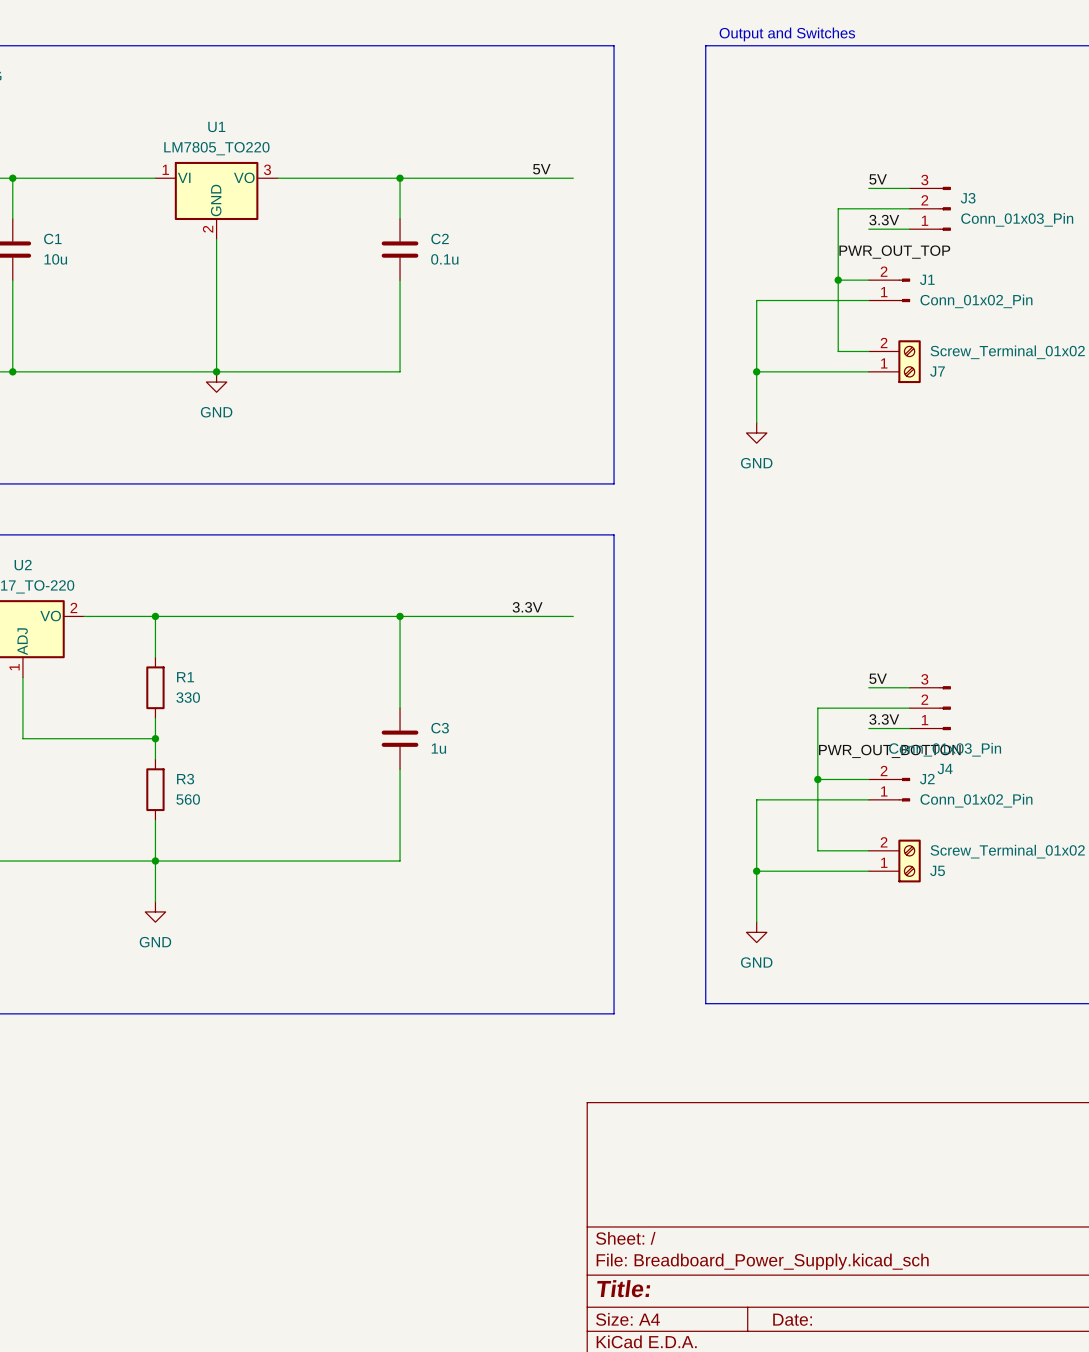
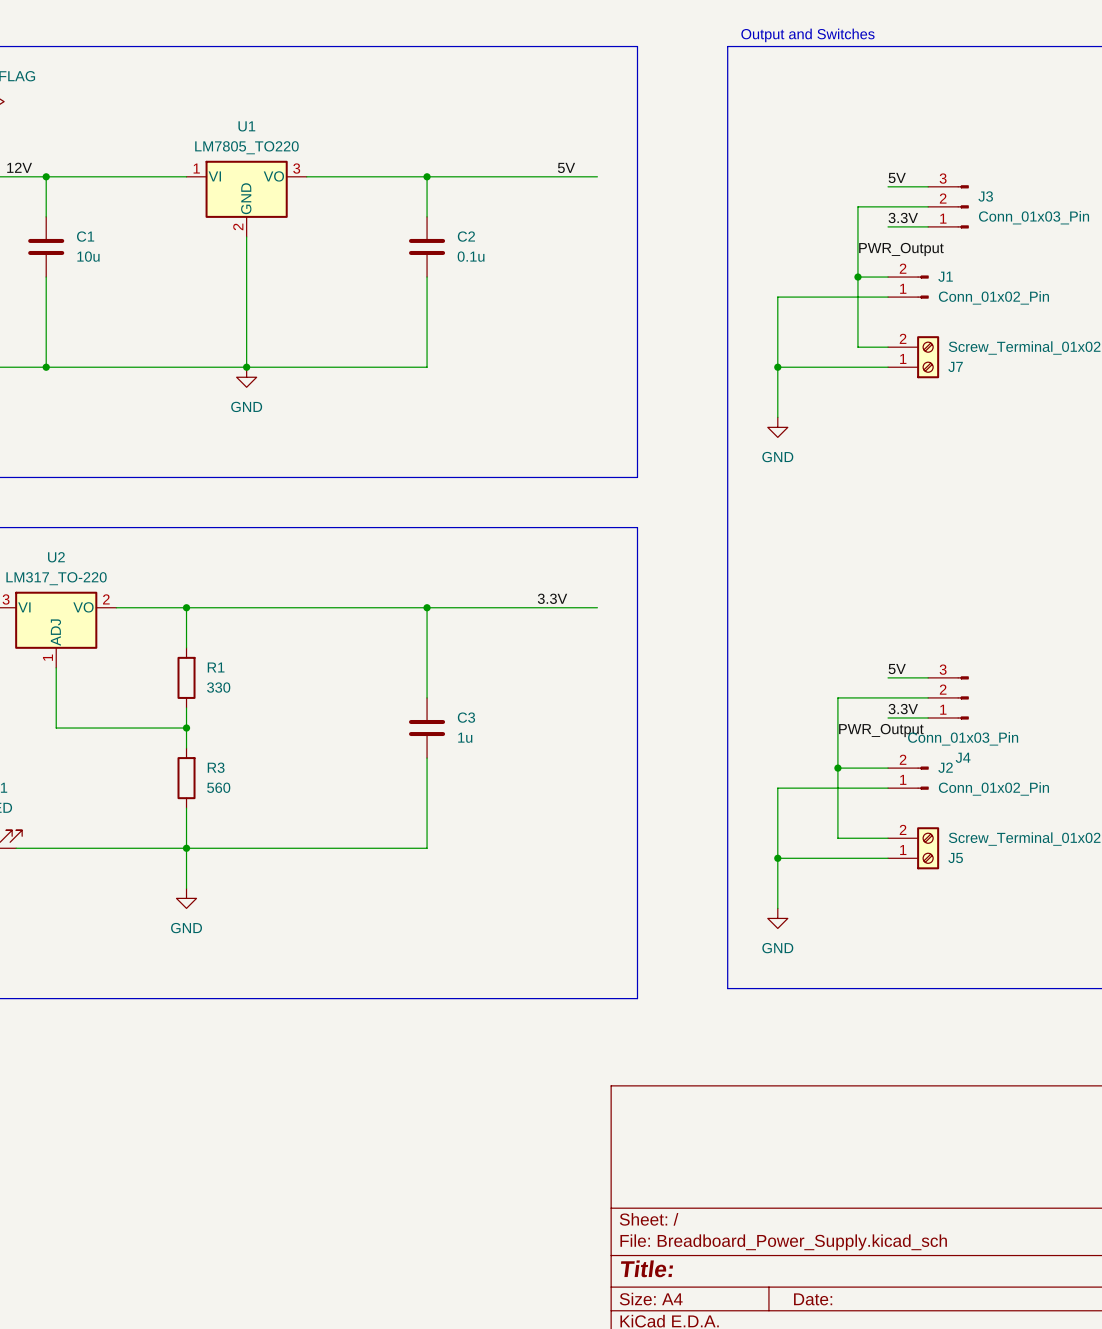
label: PWR_OUT_TOP (894, 252) -> PWR_Output (901, 249)
label: none -> PWR_Output (881, 730)
label: PWR_OUT_BOTTON (889, 751) -> none

